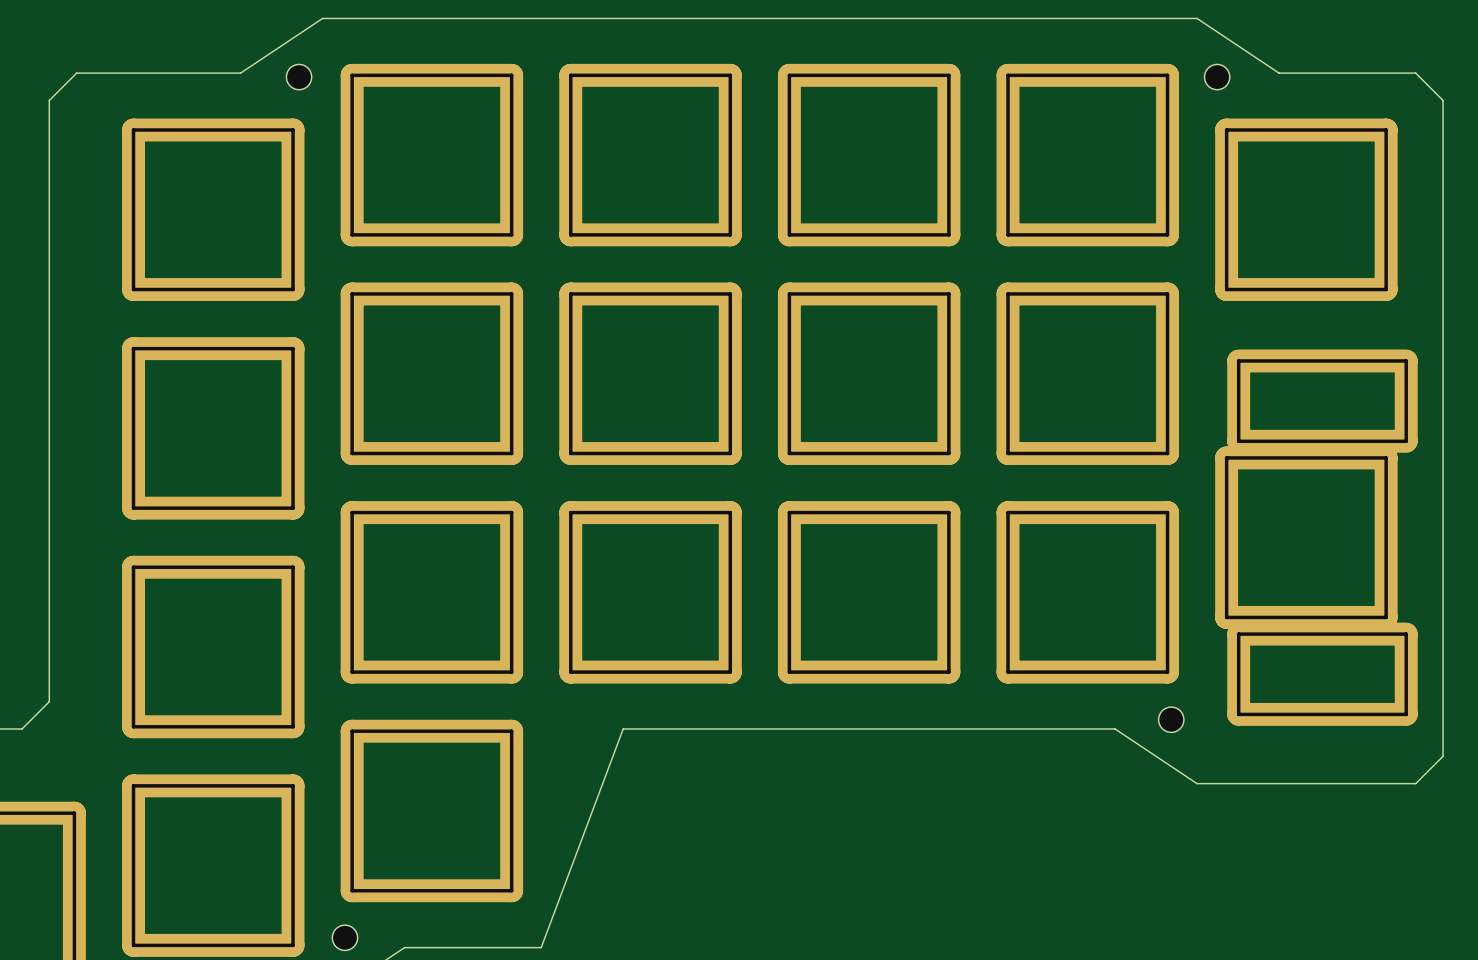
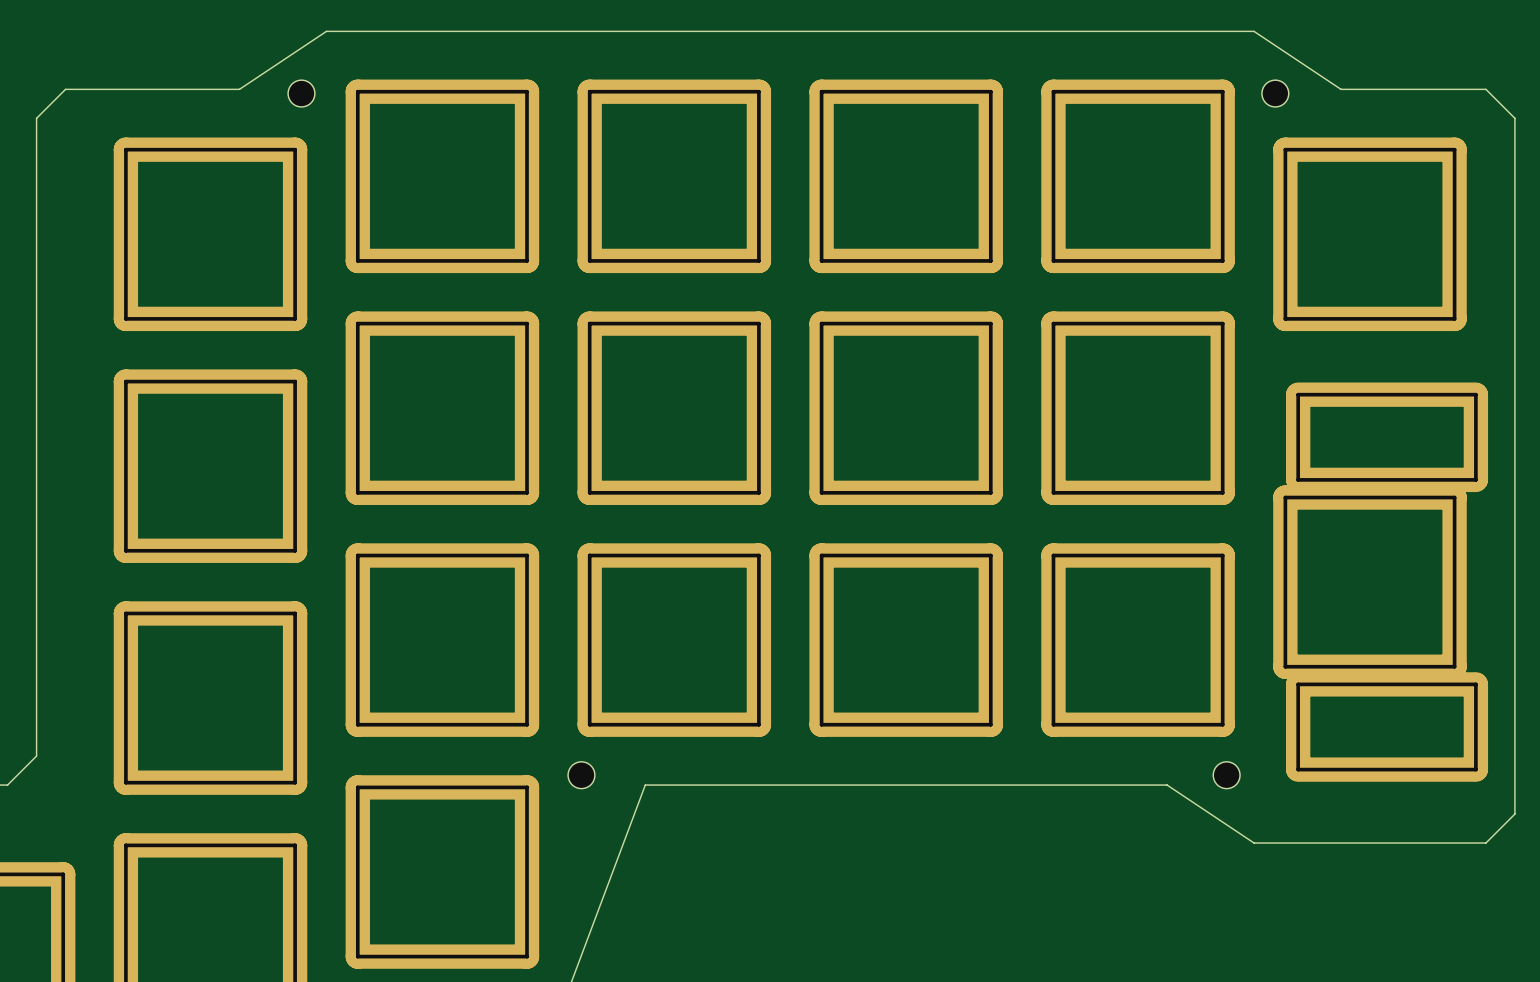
part: none -> (581, 775)

